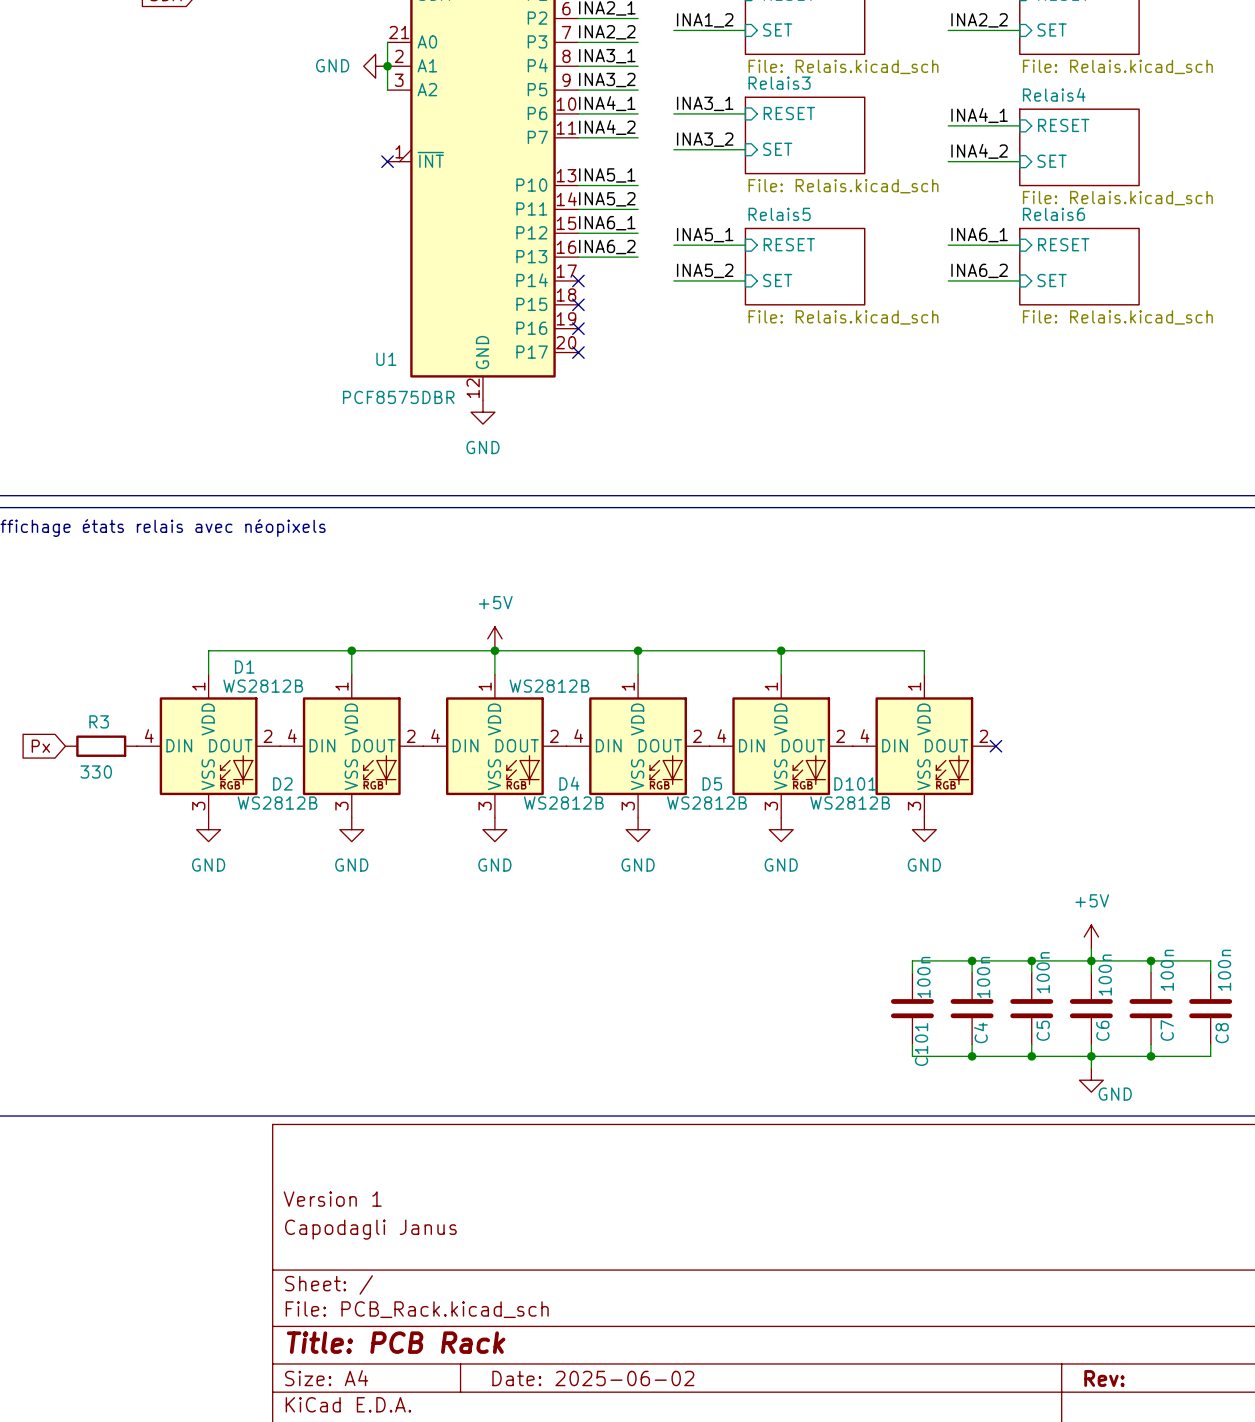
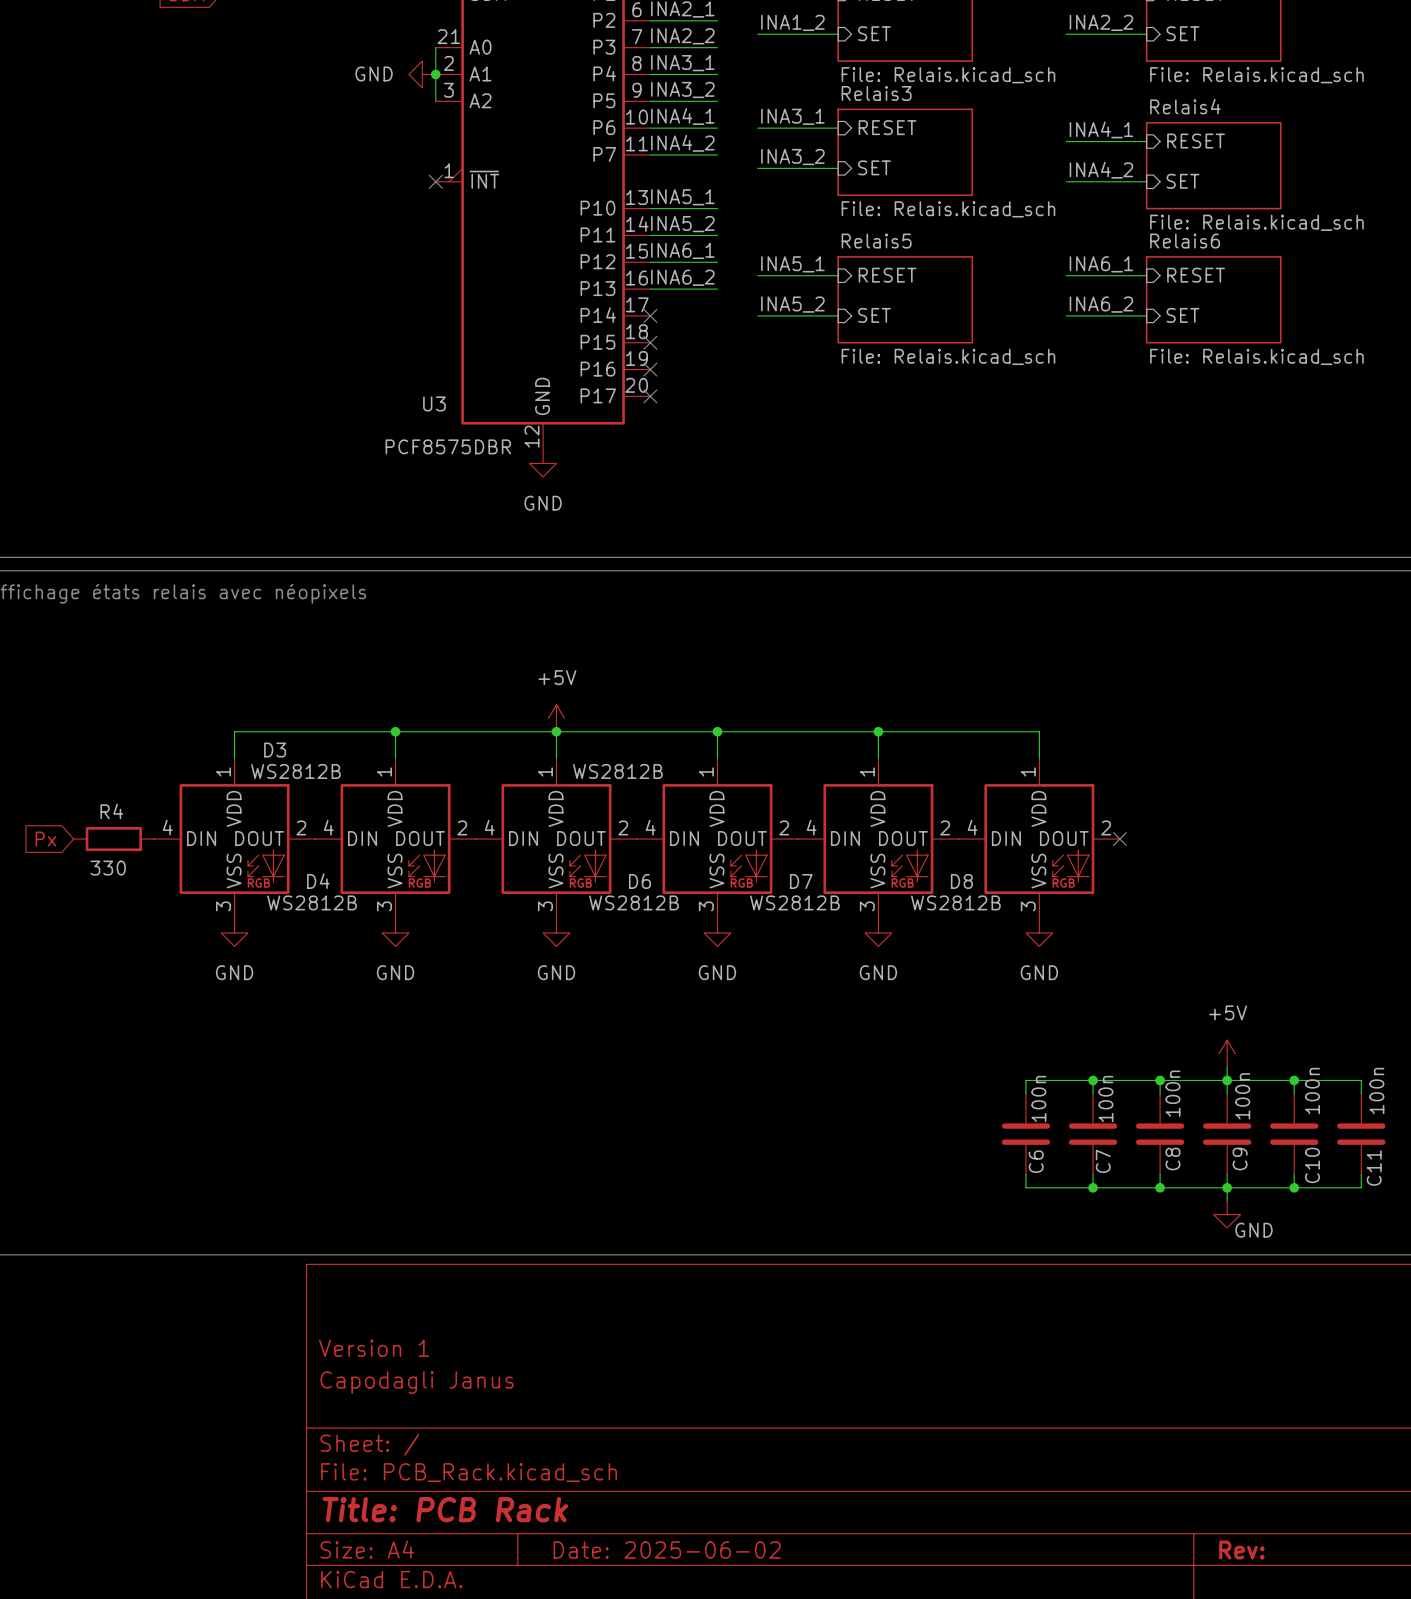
U1 name: U1 (386, 359) -> U3 (434, 403)
D1 name: D1 (244, 667) -> D3 (275, 750)
R3 name: R3 (99, 721) -> R4 (111, 811)
D2 name: D2 (282, 783) -> D4 (318, 881)
D4 name: D4 (569, 783) -> D6 (639, 881)
D5 name: D5 (712, 783) -> D7 (801, 881)
D101 name: D101 (855, 783) -> D8 (961, 881)
C5 name: C5 (1043, 1030) -> C8 (1173, 1159)
C6 name: C6 (1102, 1030) -> C9 (1240, 1159)
C7 name: C7 (1167, 1030) -> C10 (1312, 1165)
C4 name: C4 (980, 1032) -> C7 (1103, 1161)
C8 name: C8 (1222, 1033) -> C11 (1374, 1168)
C101 name: C101 (921, 1044) -> C6 (1036, 1161)

